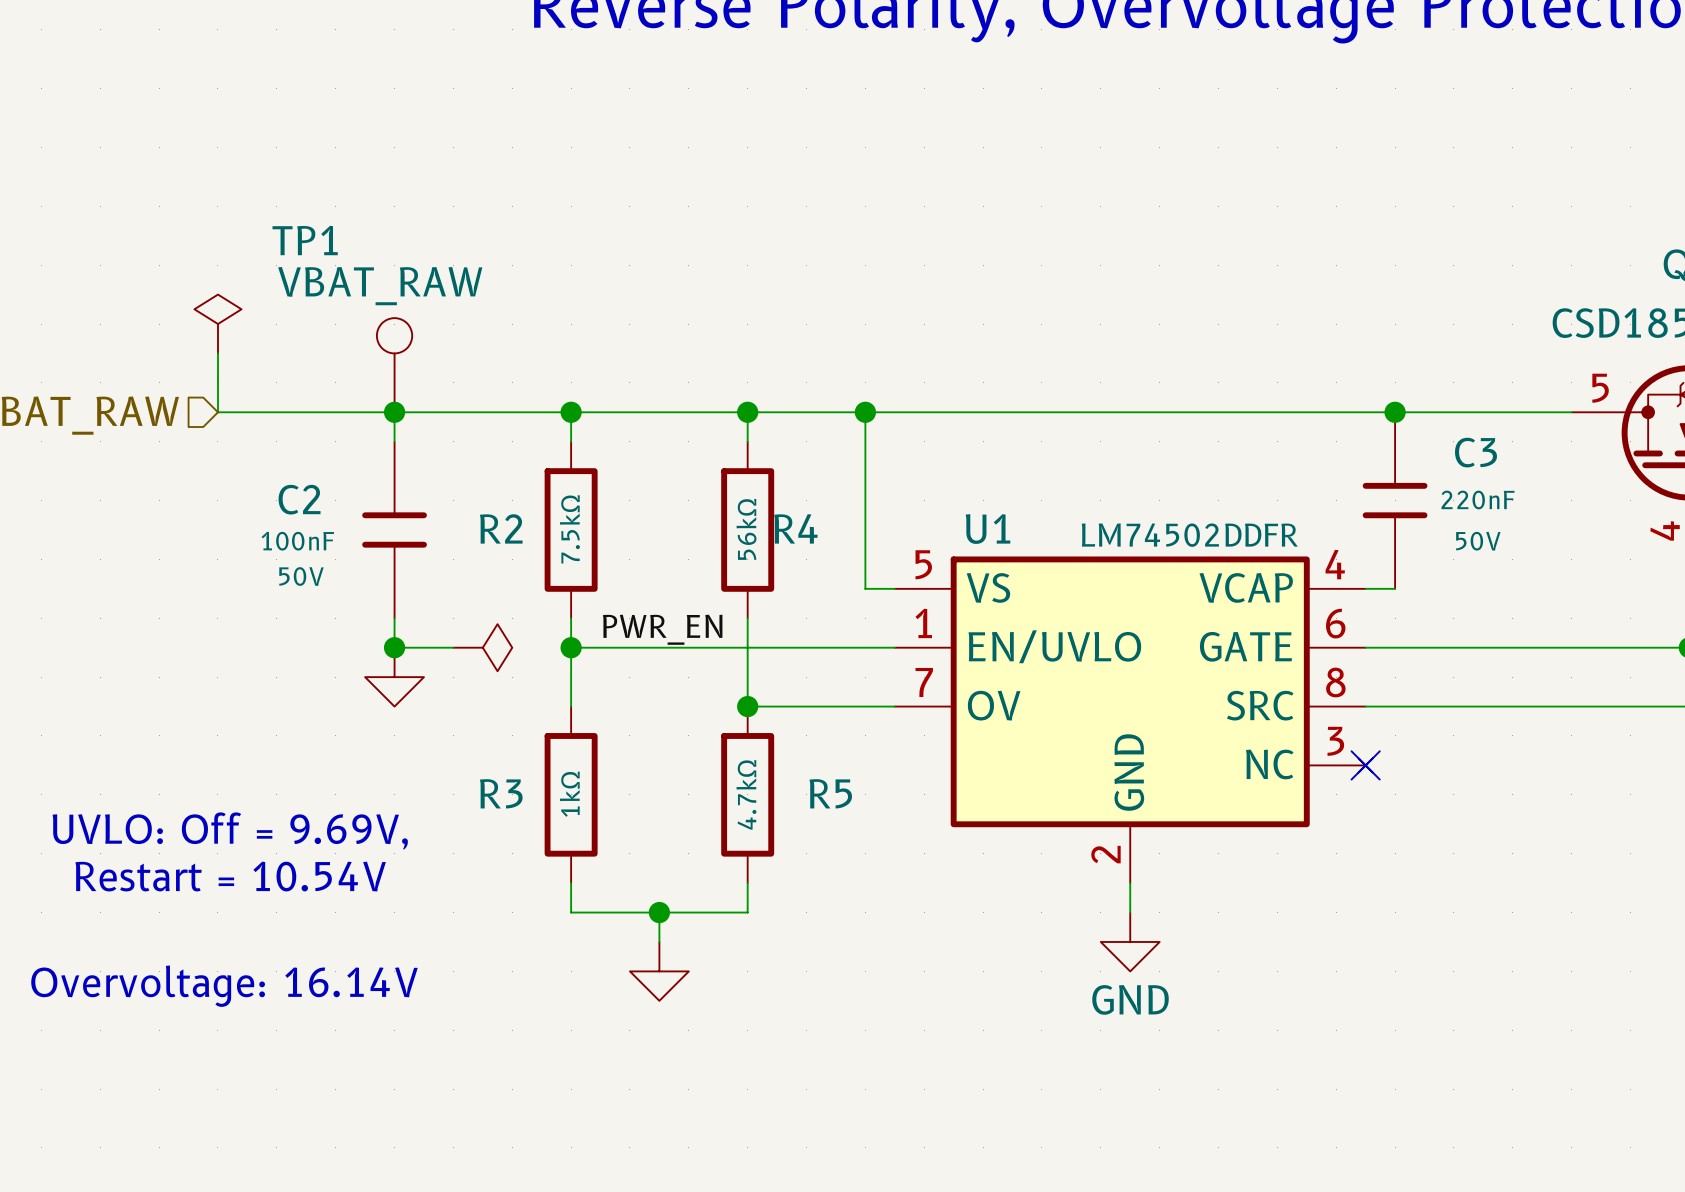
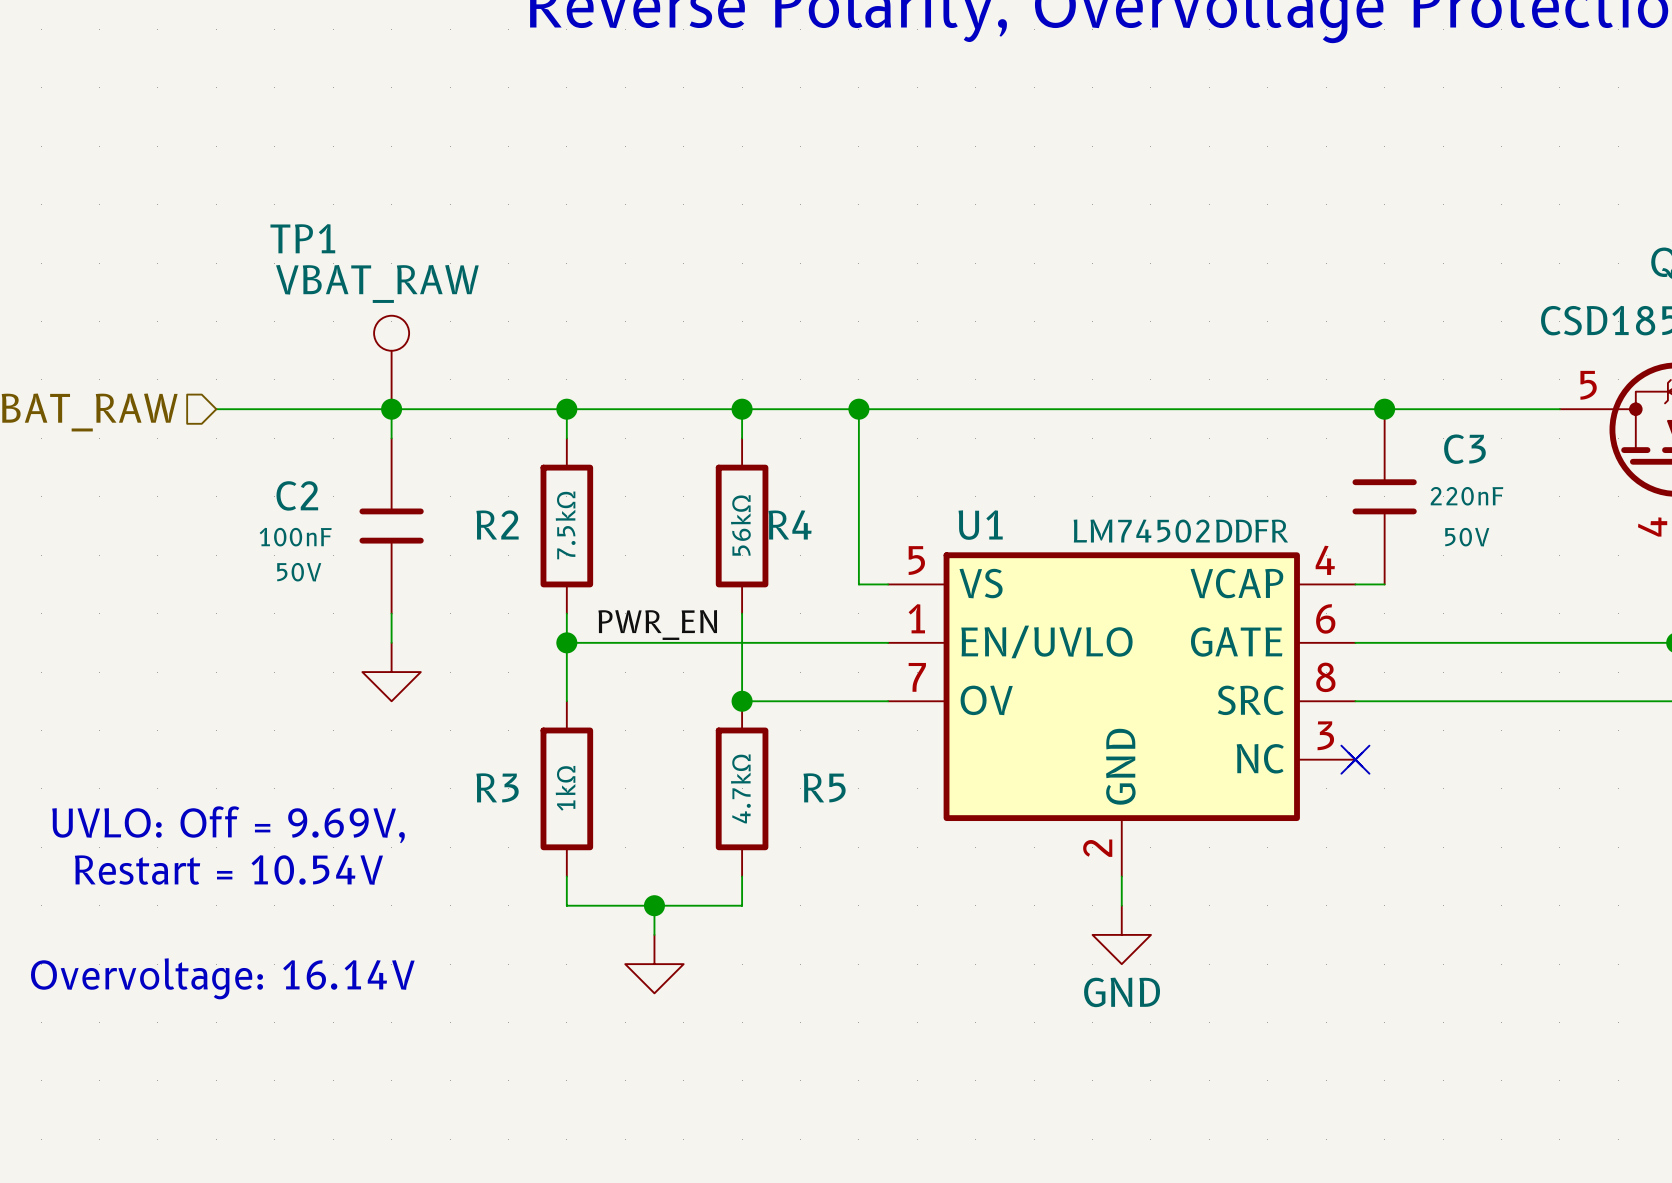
power symbol: (217, 324) -> none
wire: (217, 353) (217, 412) -> none
wire: (394, 647) (453, 647) -> none
junction: (394, 647) -> none
power symbol: (482, 647) -> none

